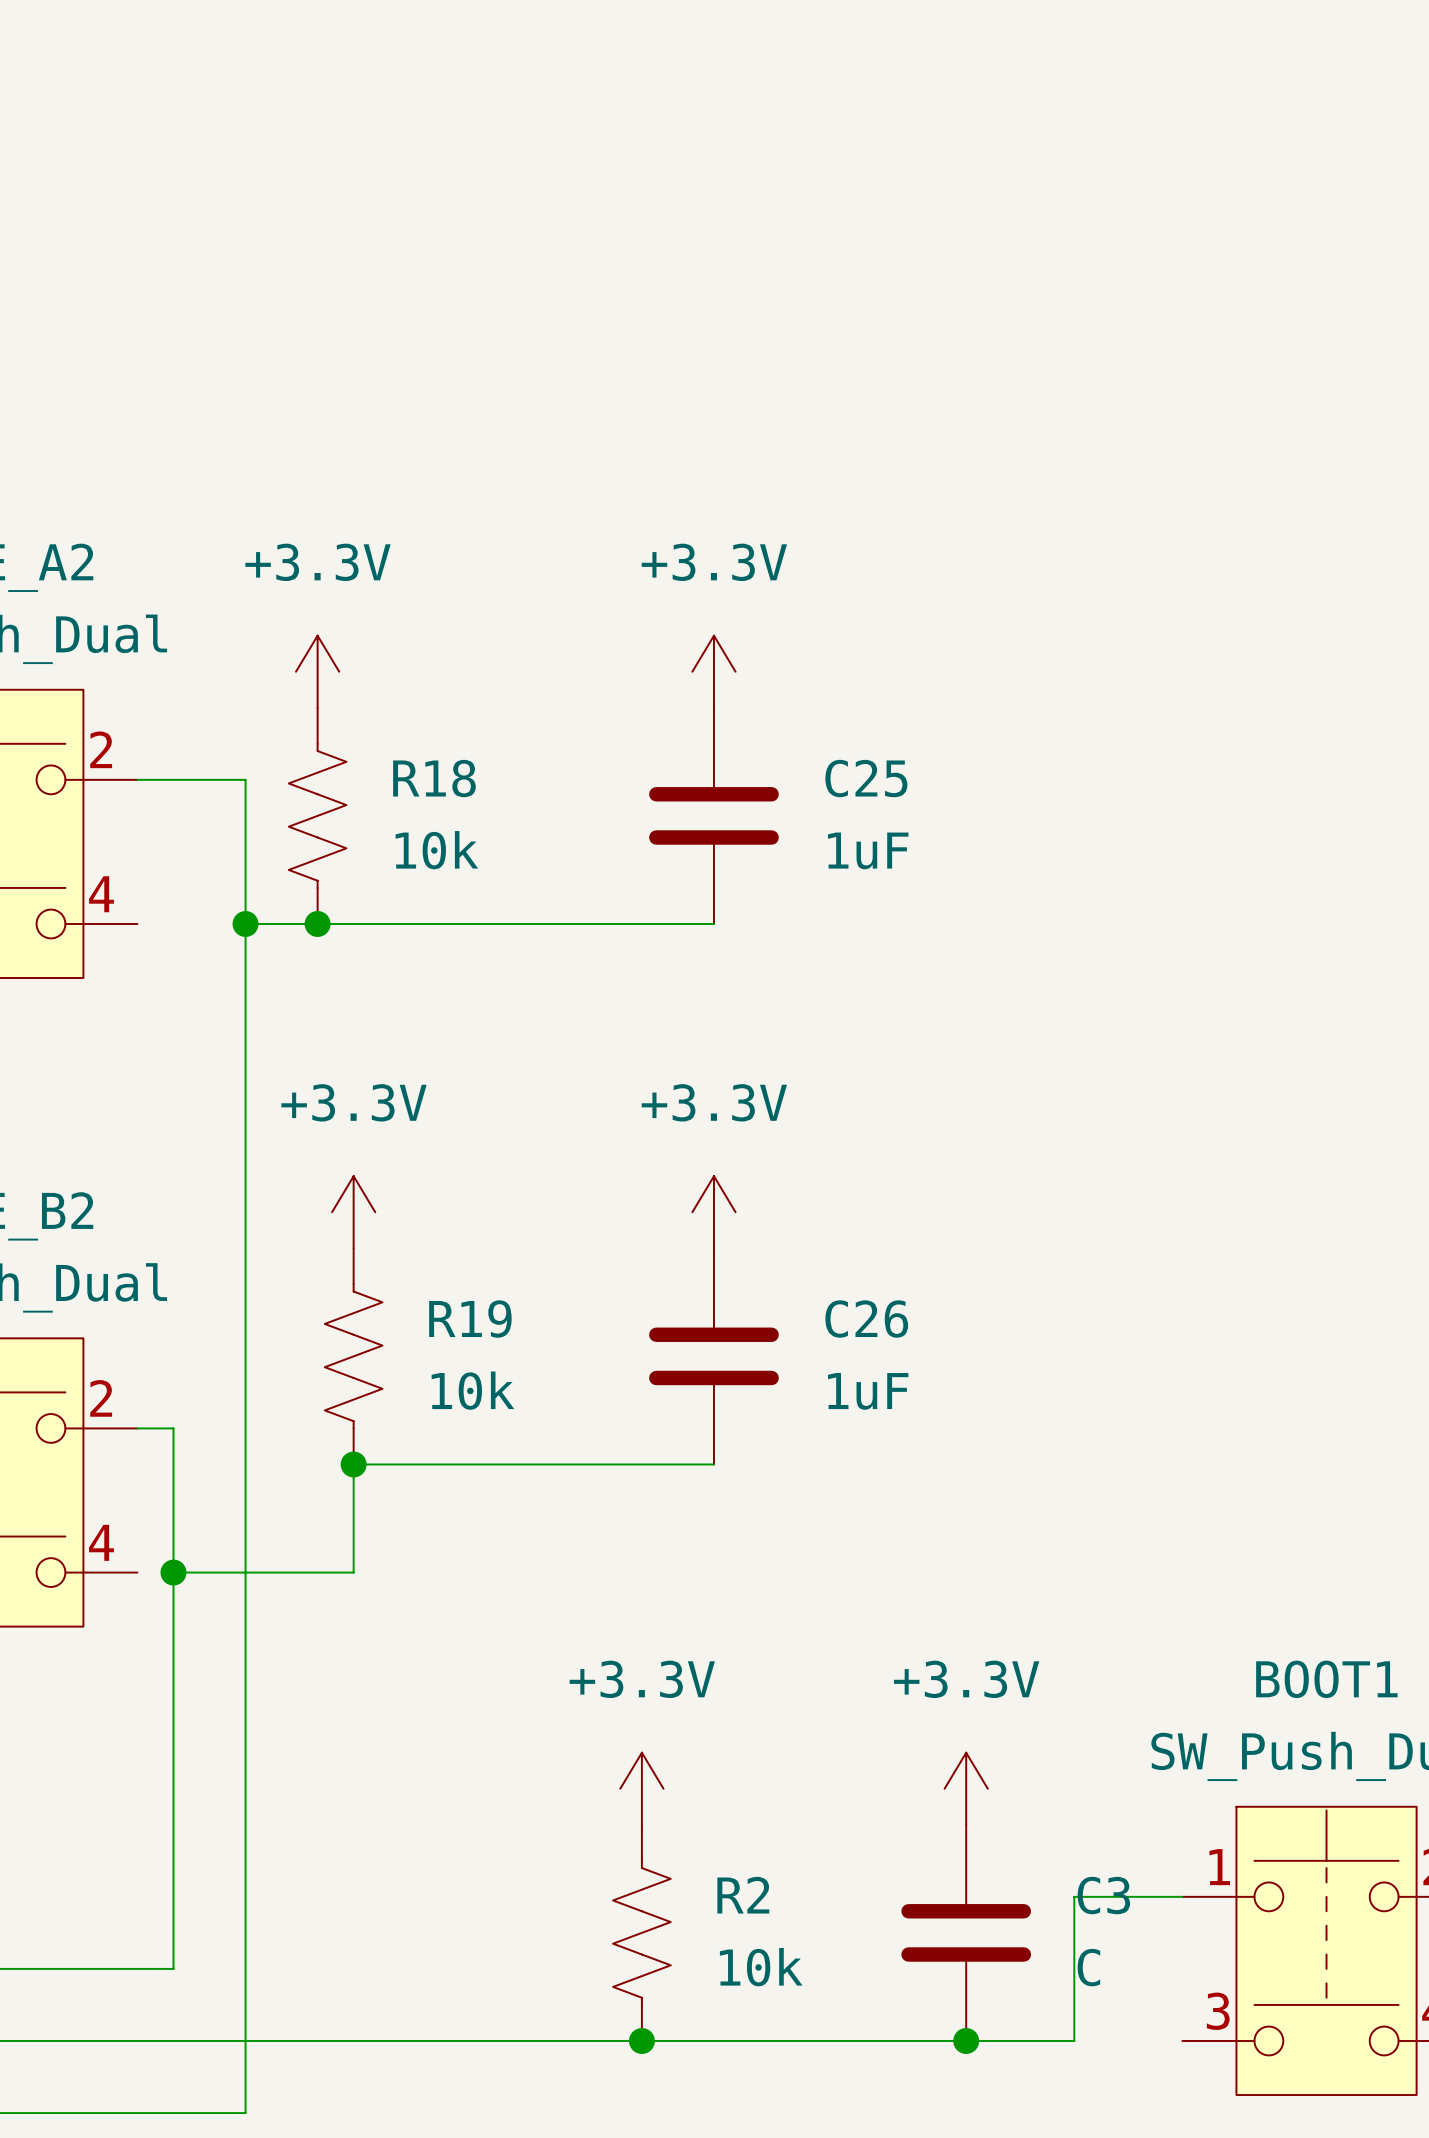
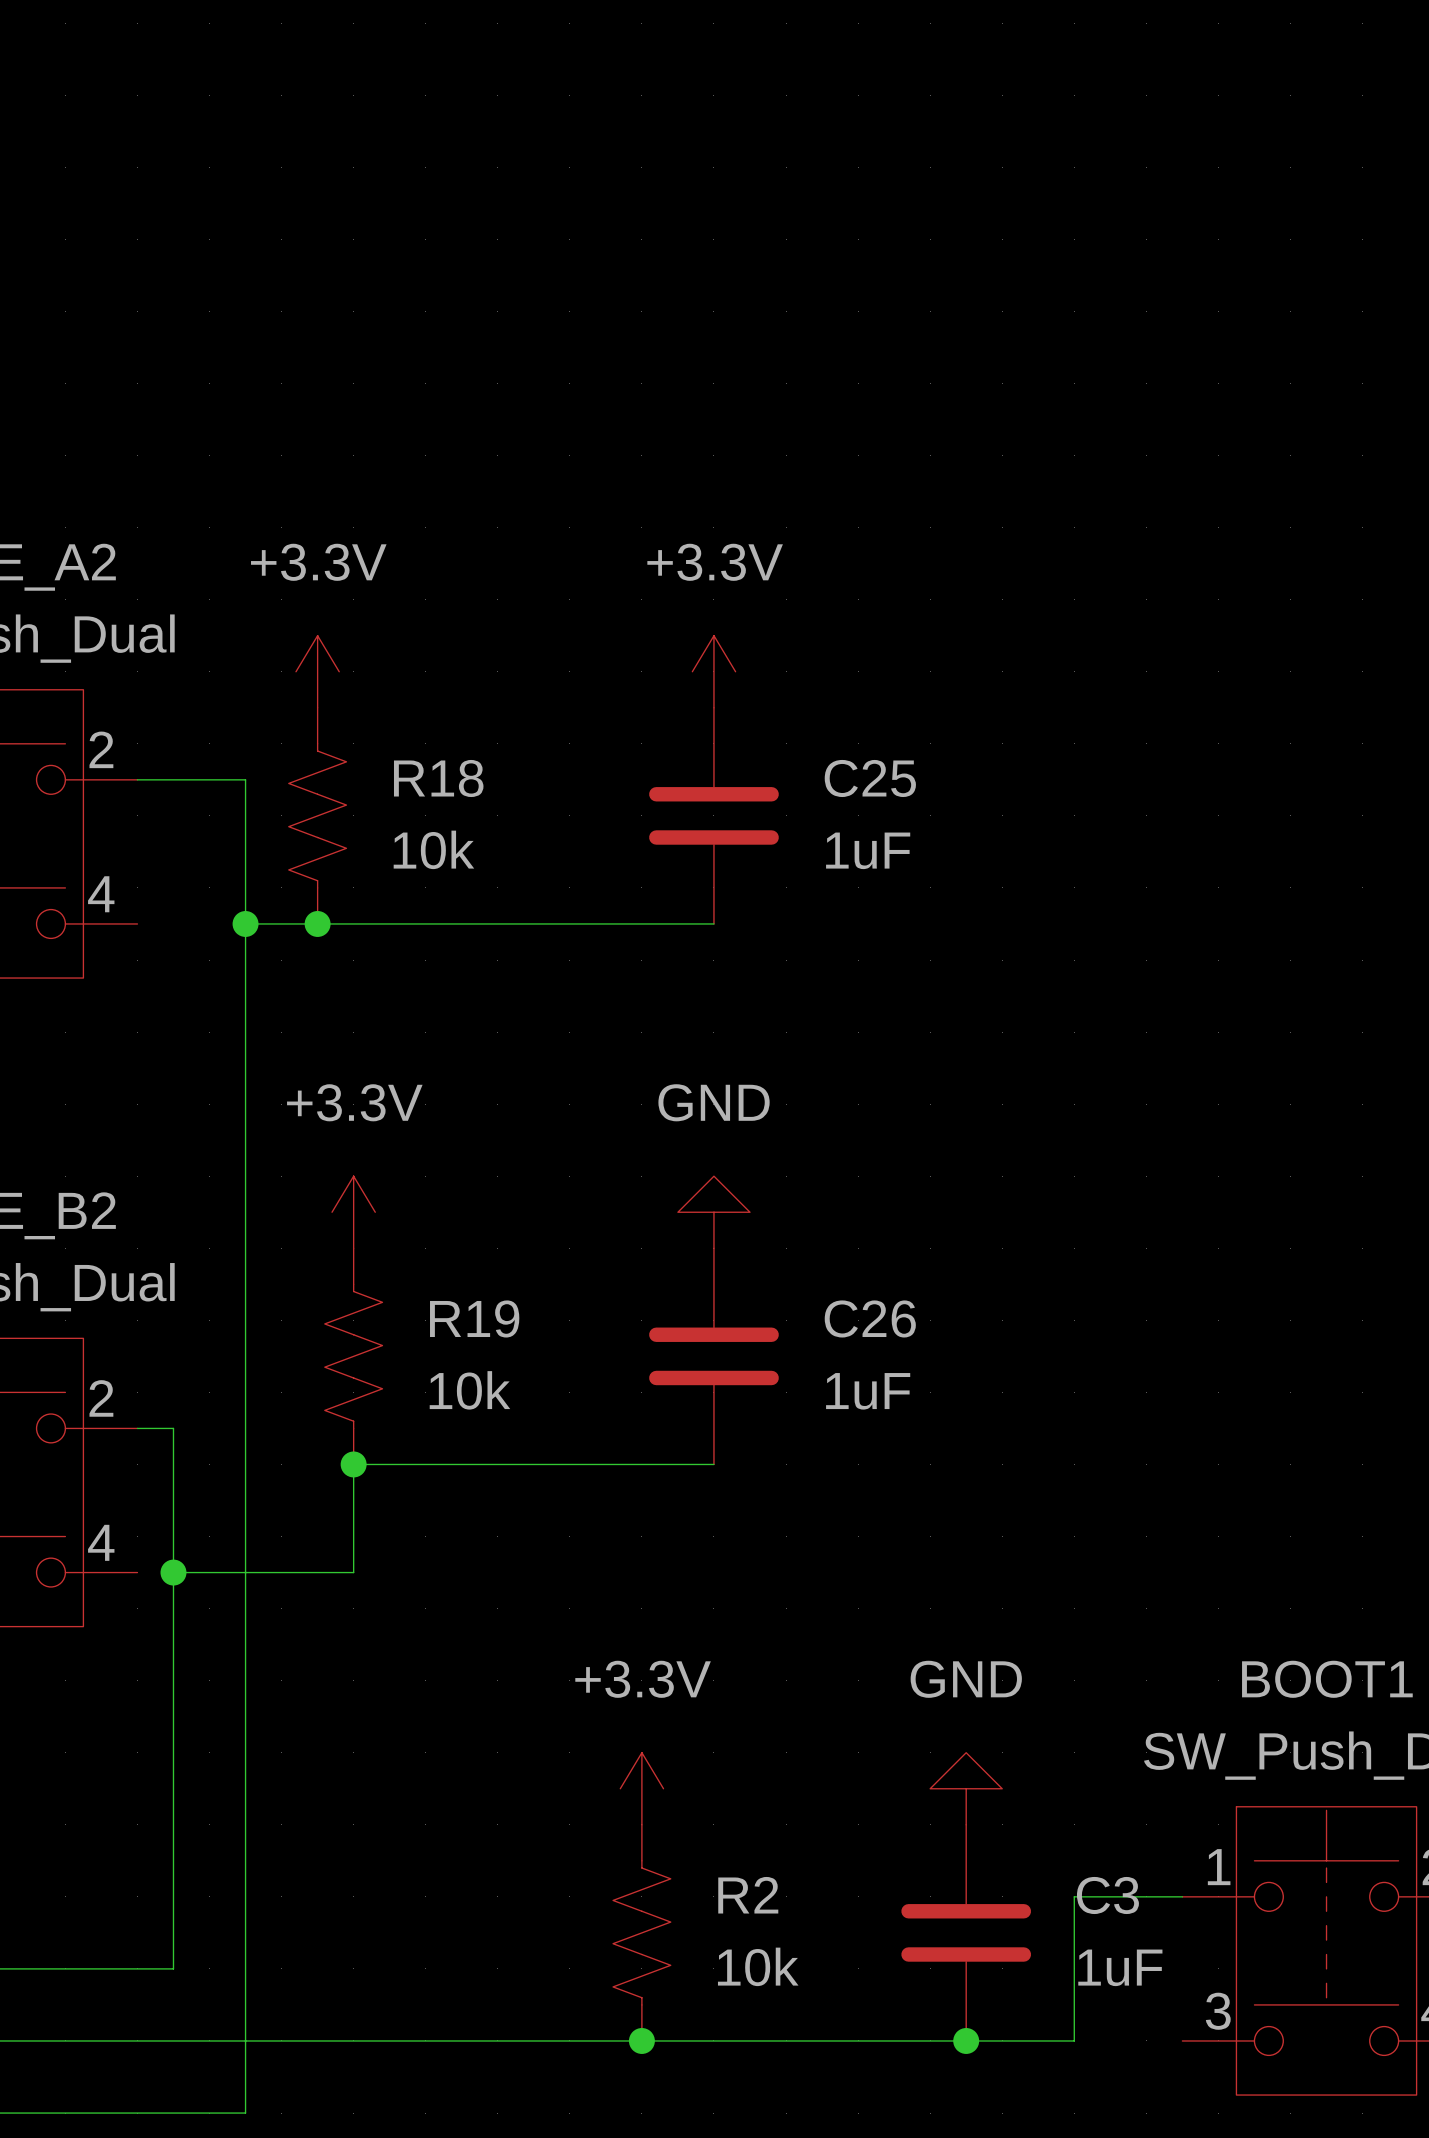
power symbol: +3.3V (713, 1212) -> GND (713, 1212)
power symbol: +3.3V (966, 1788) -> GND (966, 1788)
C3 value: C (1088, 1967) -> 1uF (1120, 1967)

